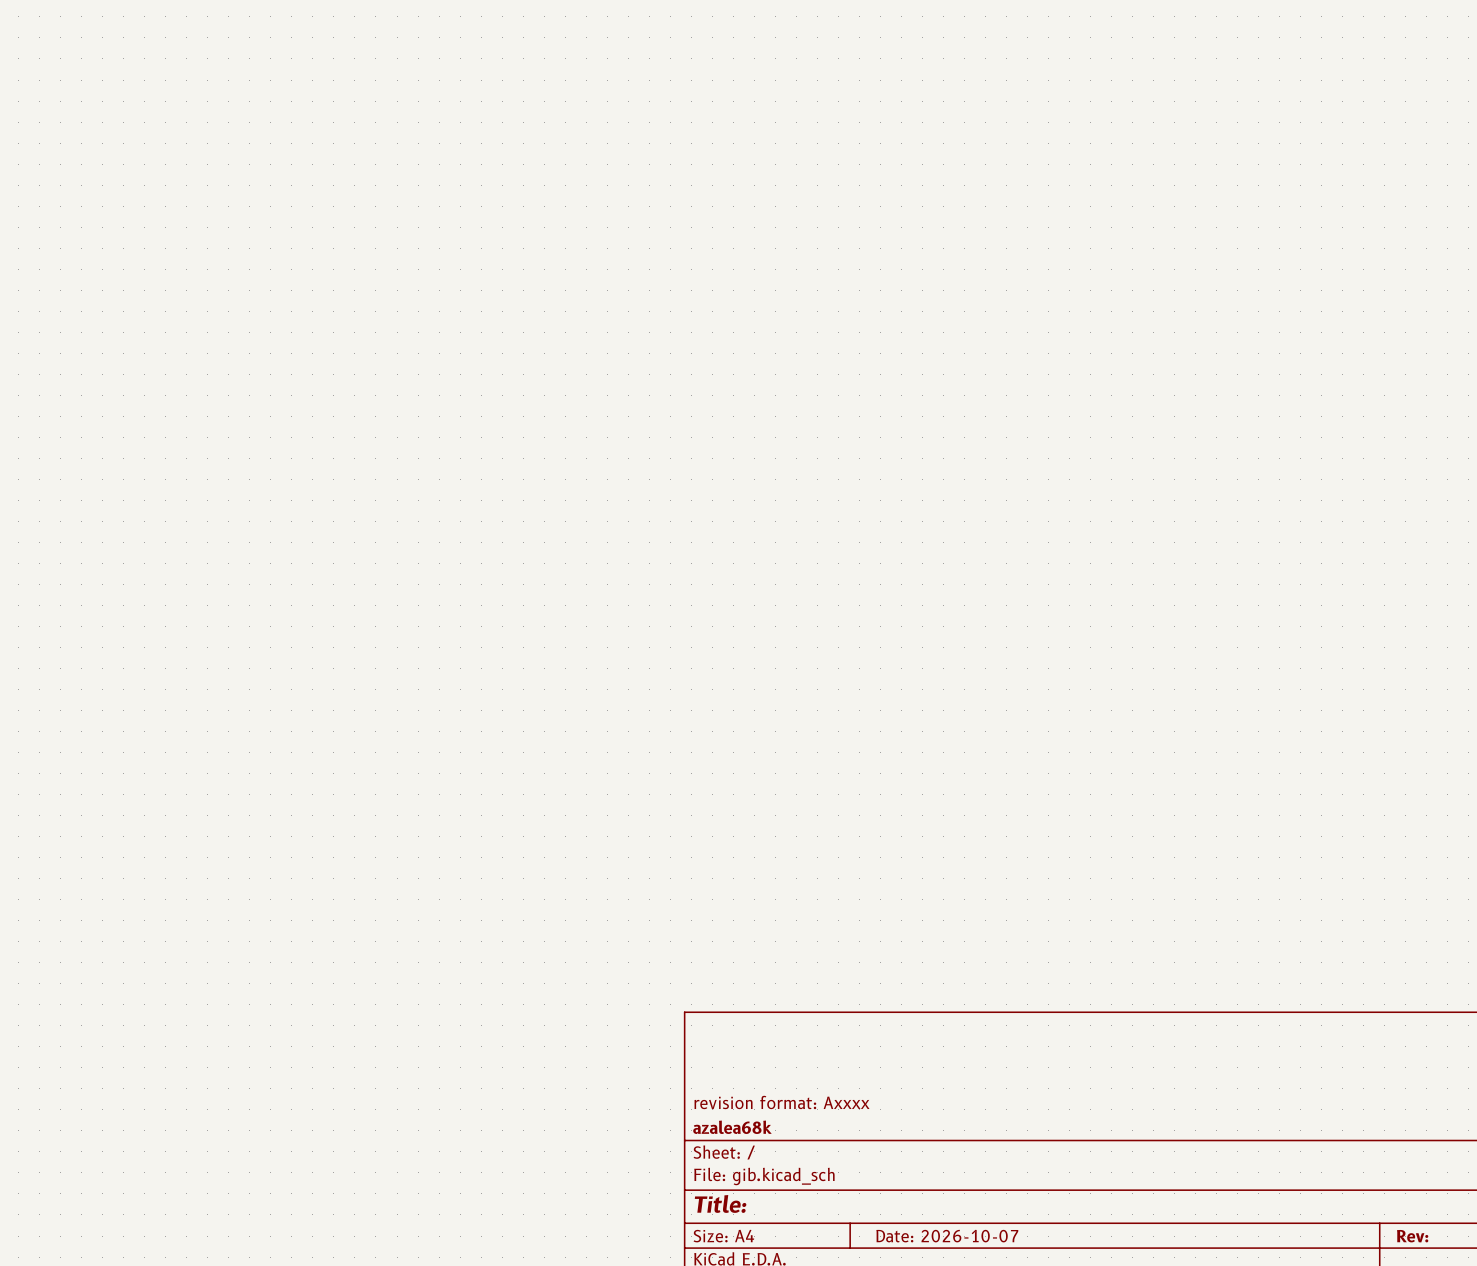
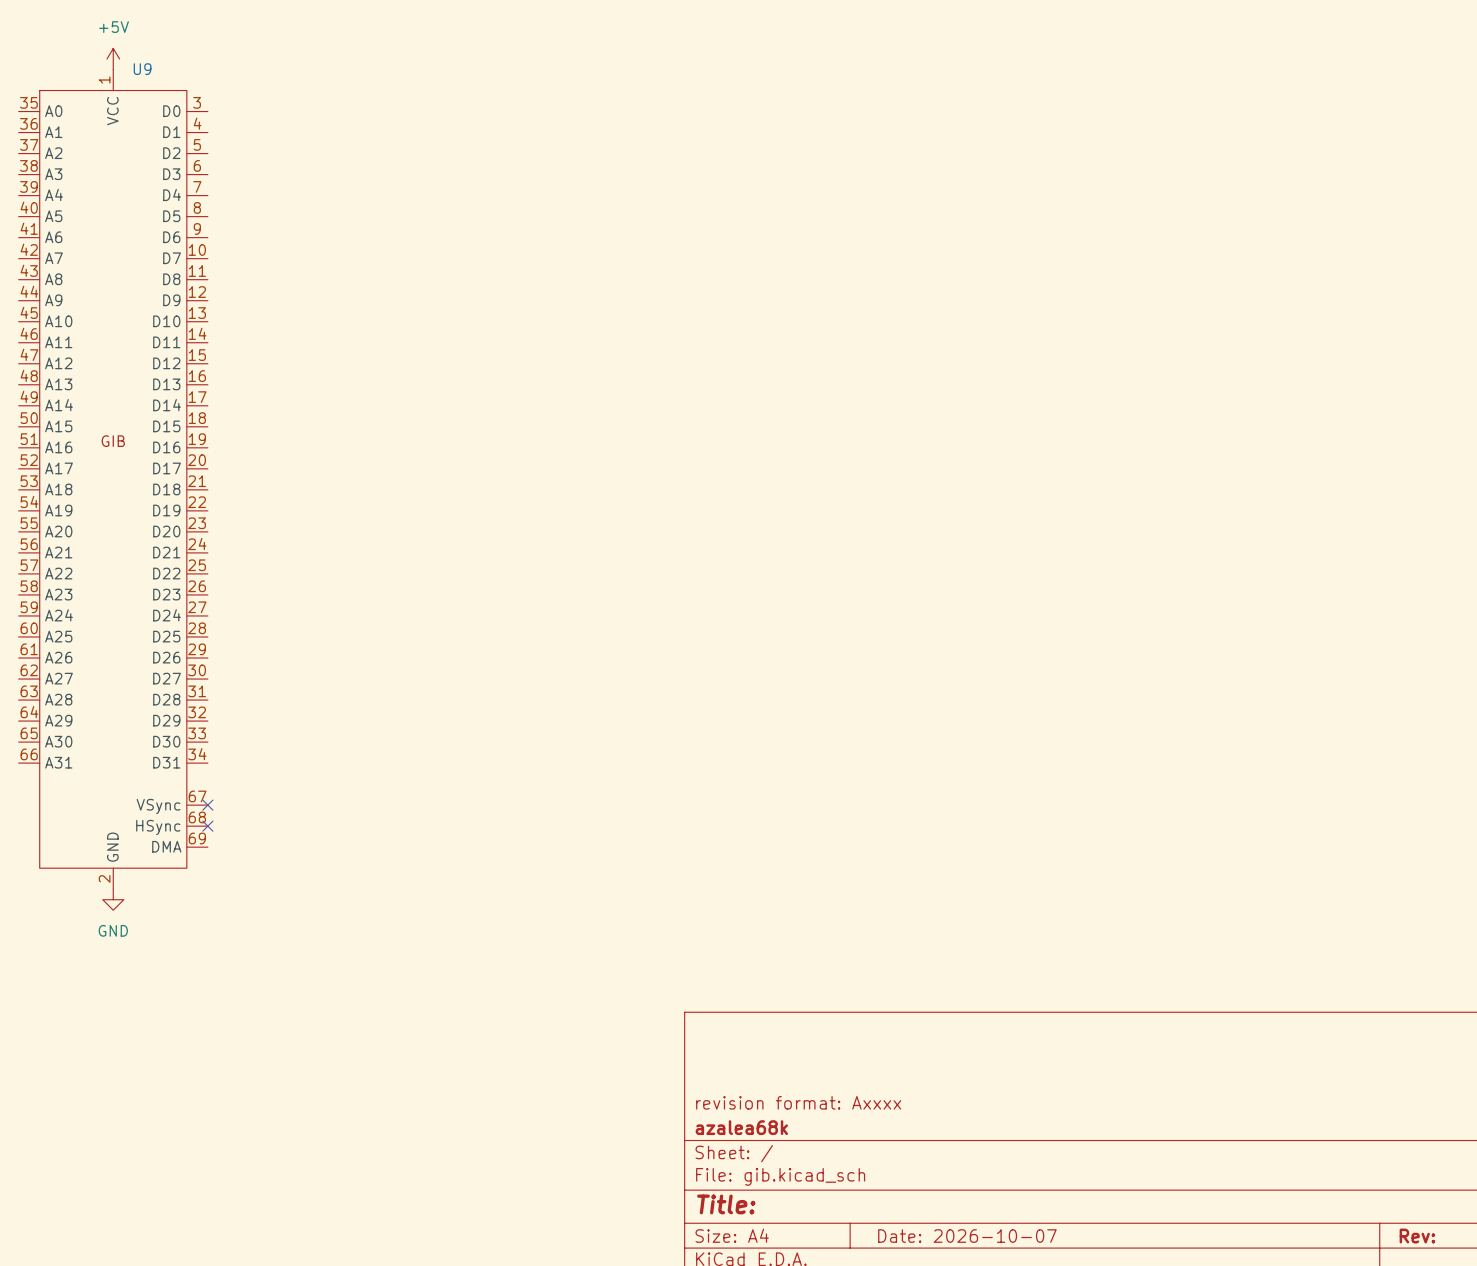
power symbol: none -> +5V (113, 58)
U9: none -> (113, 479)
no-connect mark: none -> (207, 805)
no-connect mark: none -> (207, 826)
power symbol: none -> GND (113, 899)

